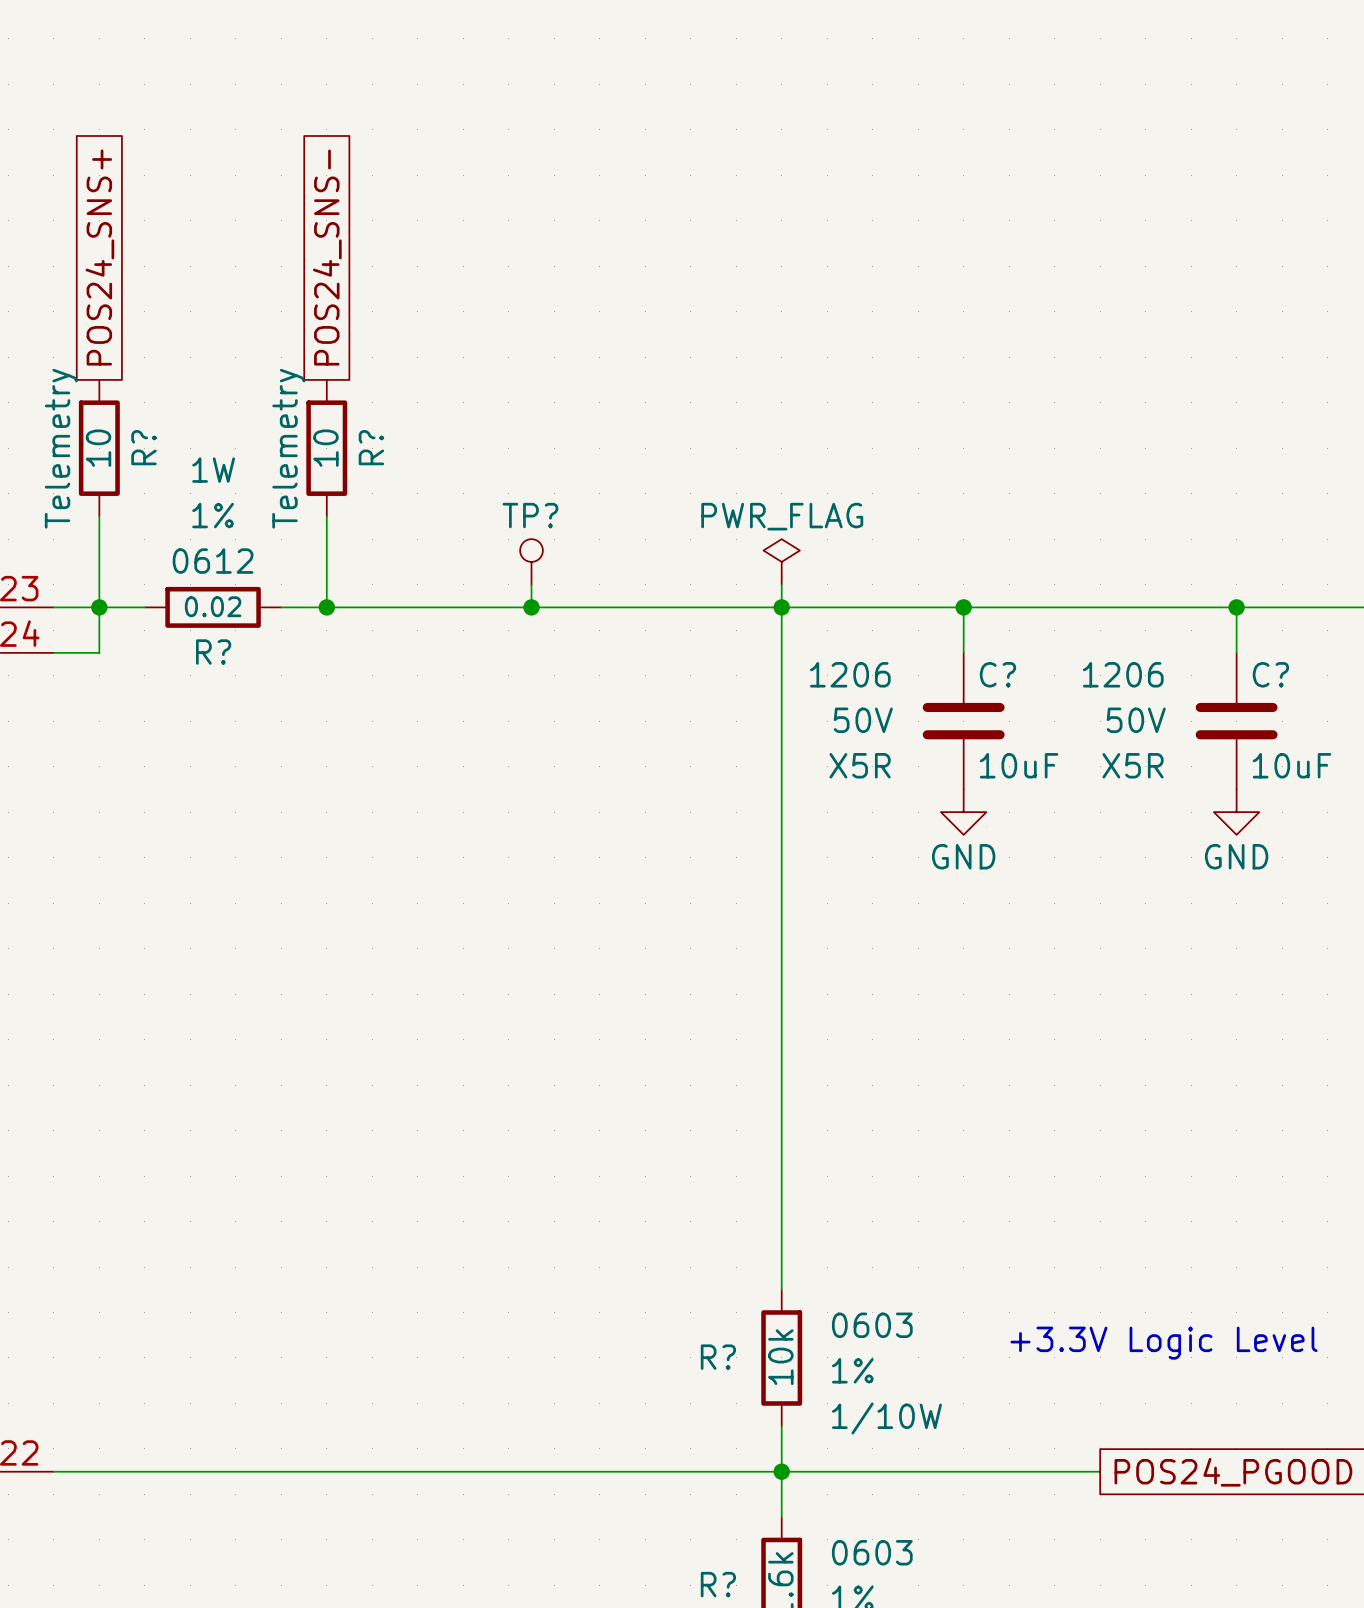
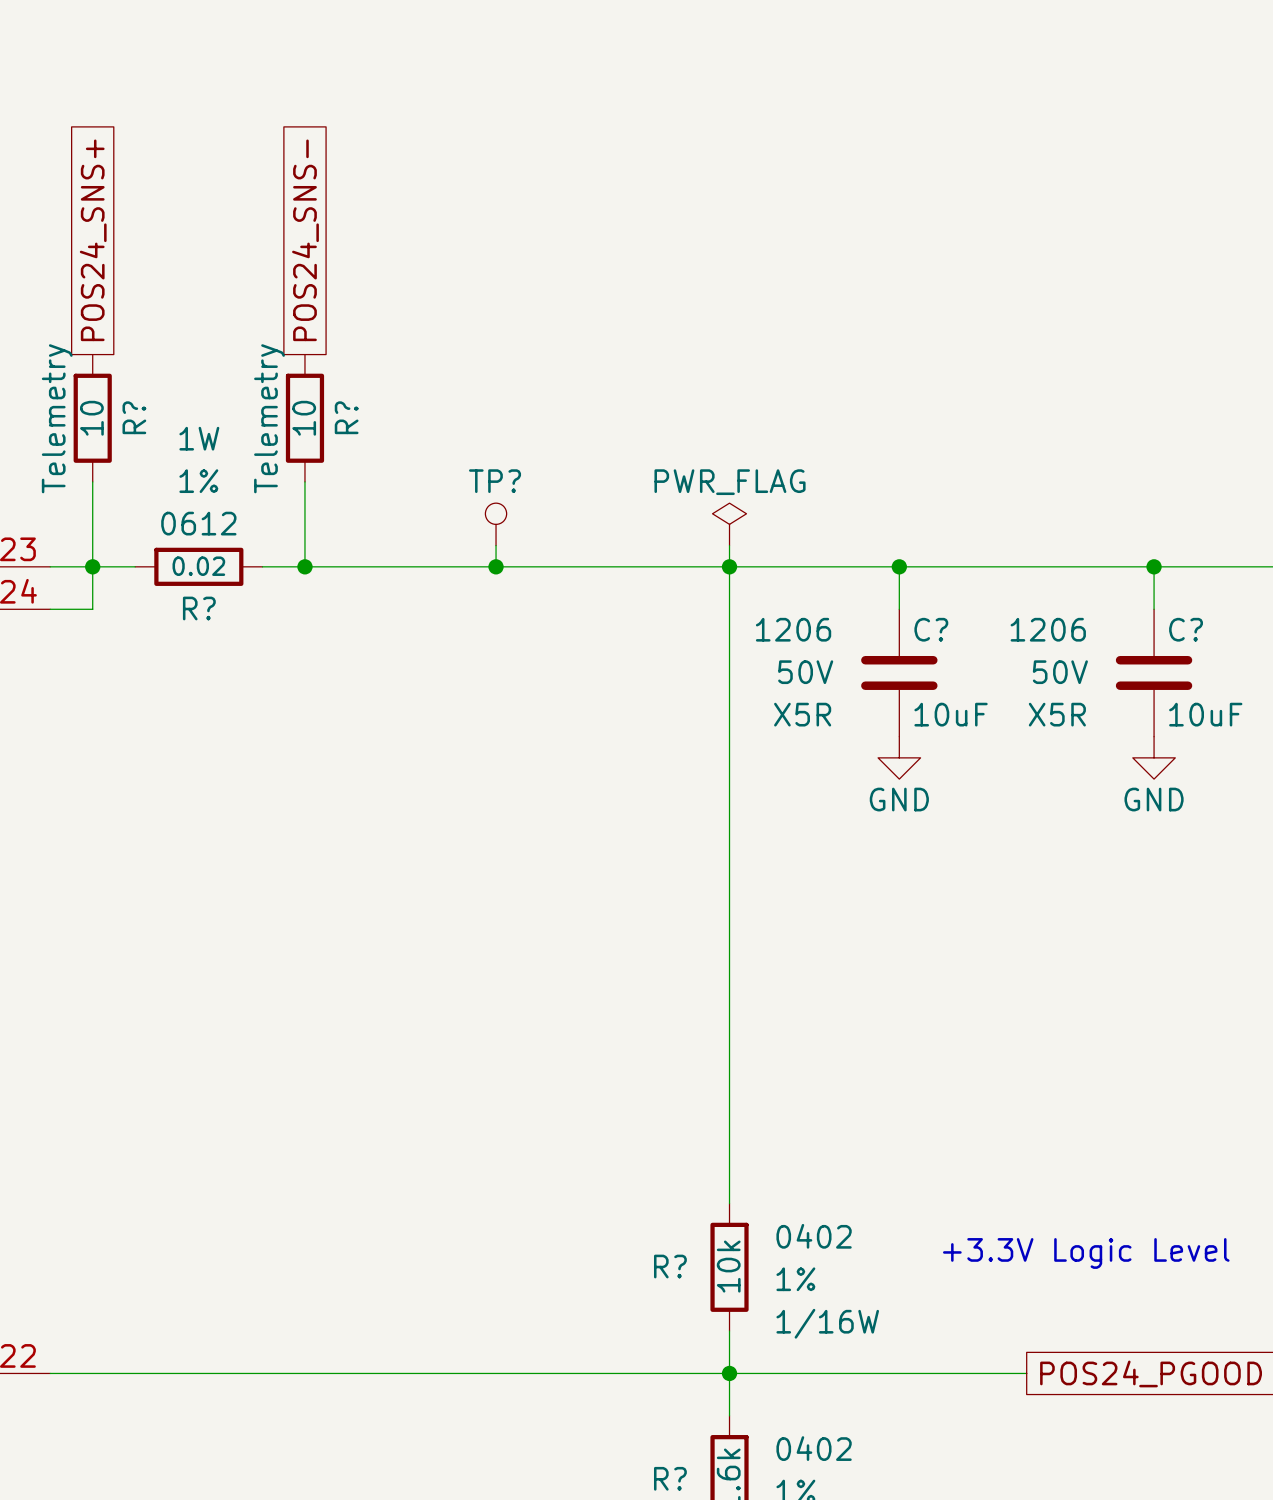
R? text: 0603 (872, 1325) -> 0402 (814, 1236)
R? text: 1/10W (886, 1418) -> 1/16W (827, 1323)
R? text: 0603 (872, 1552) -> 0402 (814, 1448)

